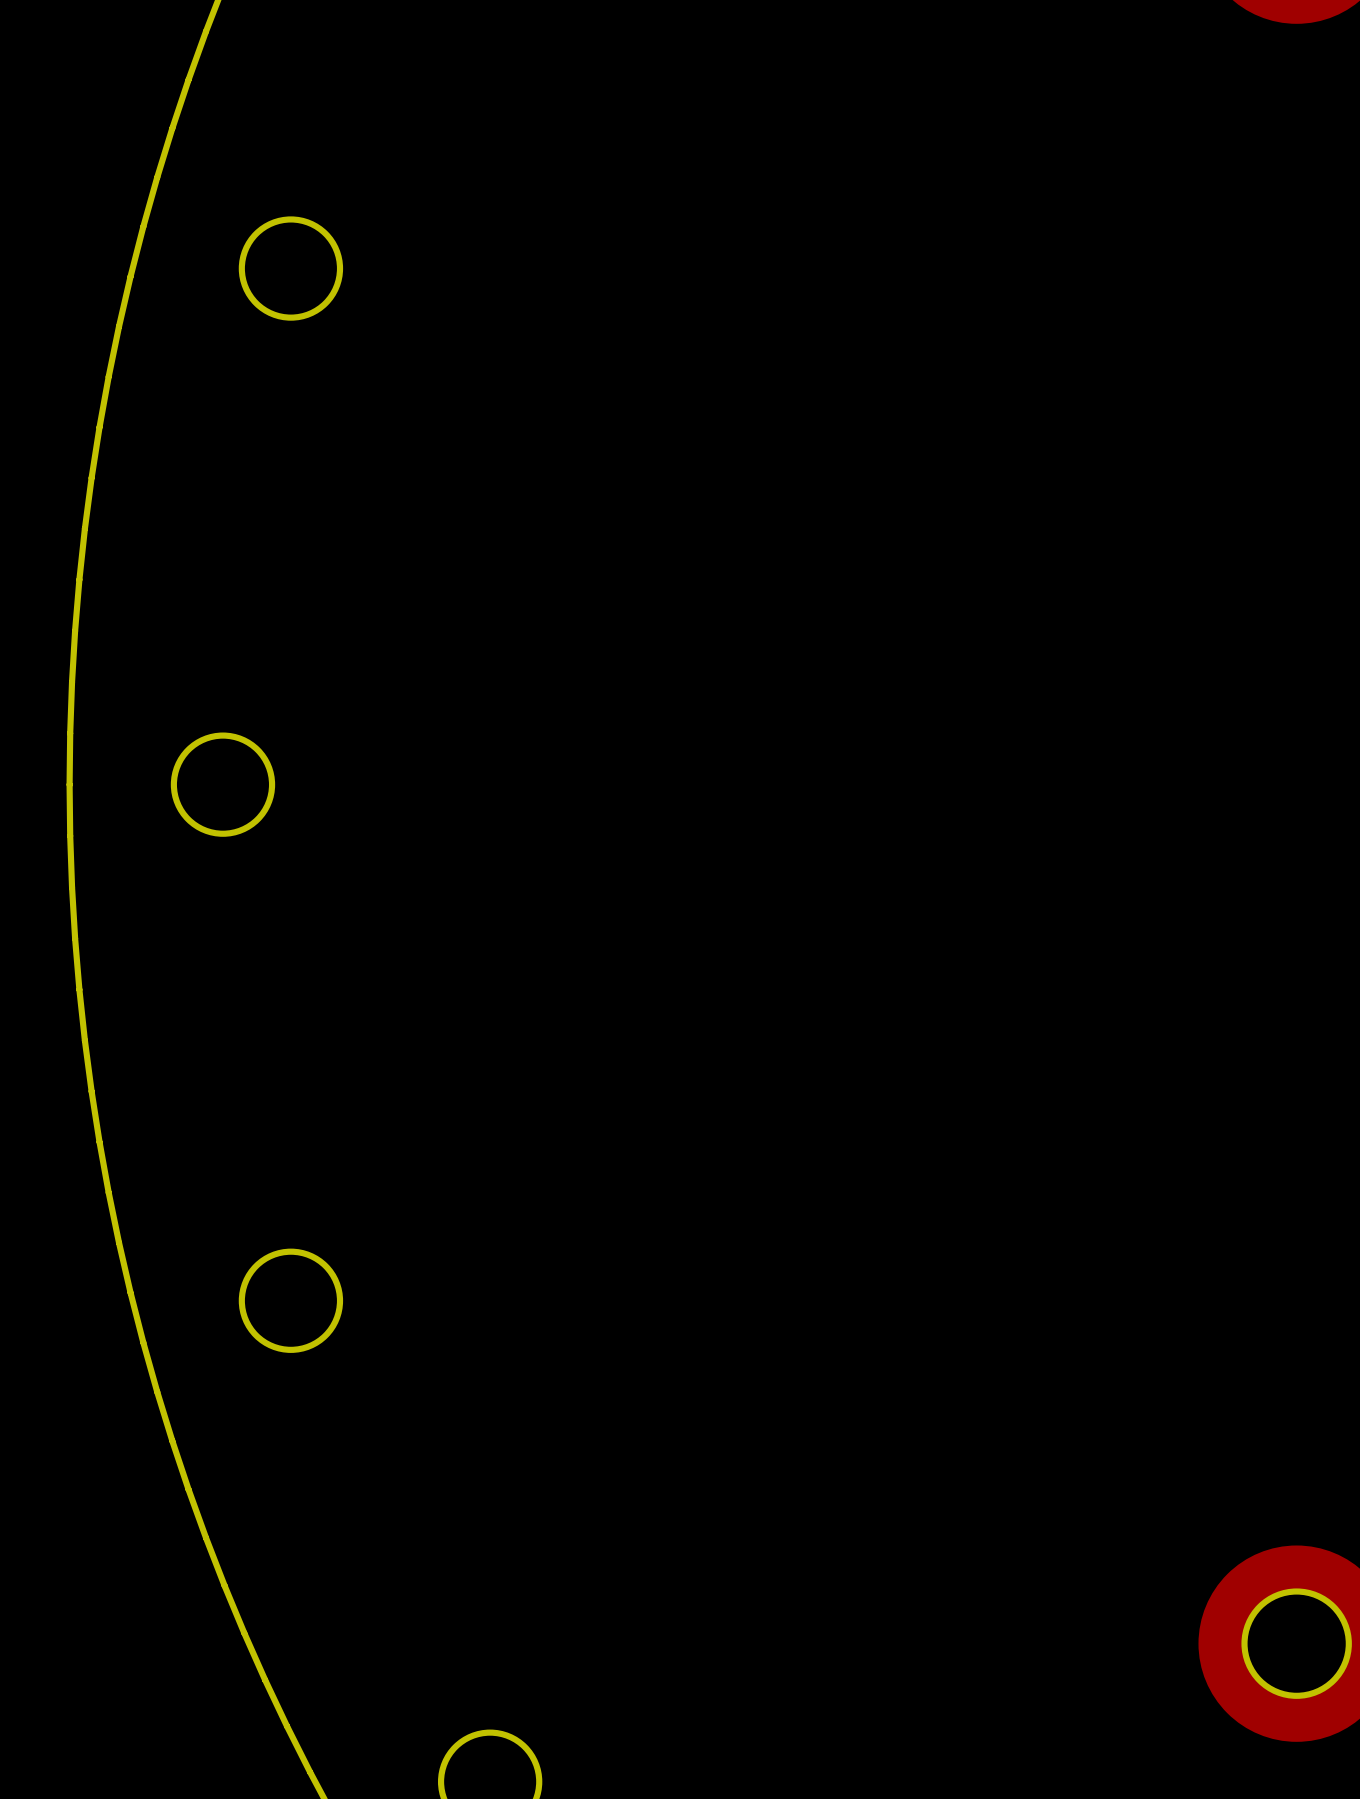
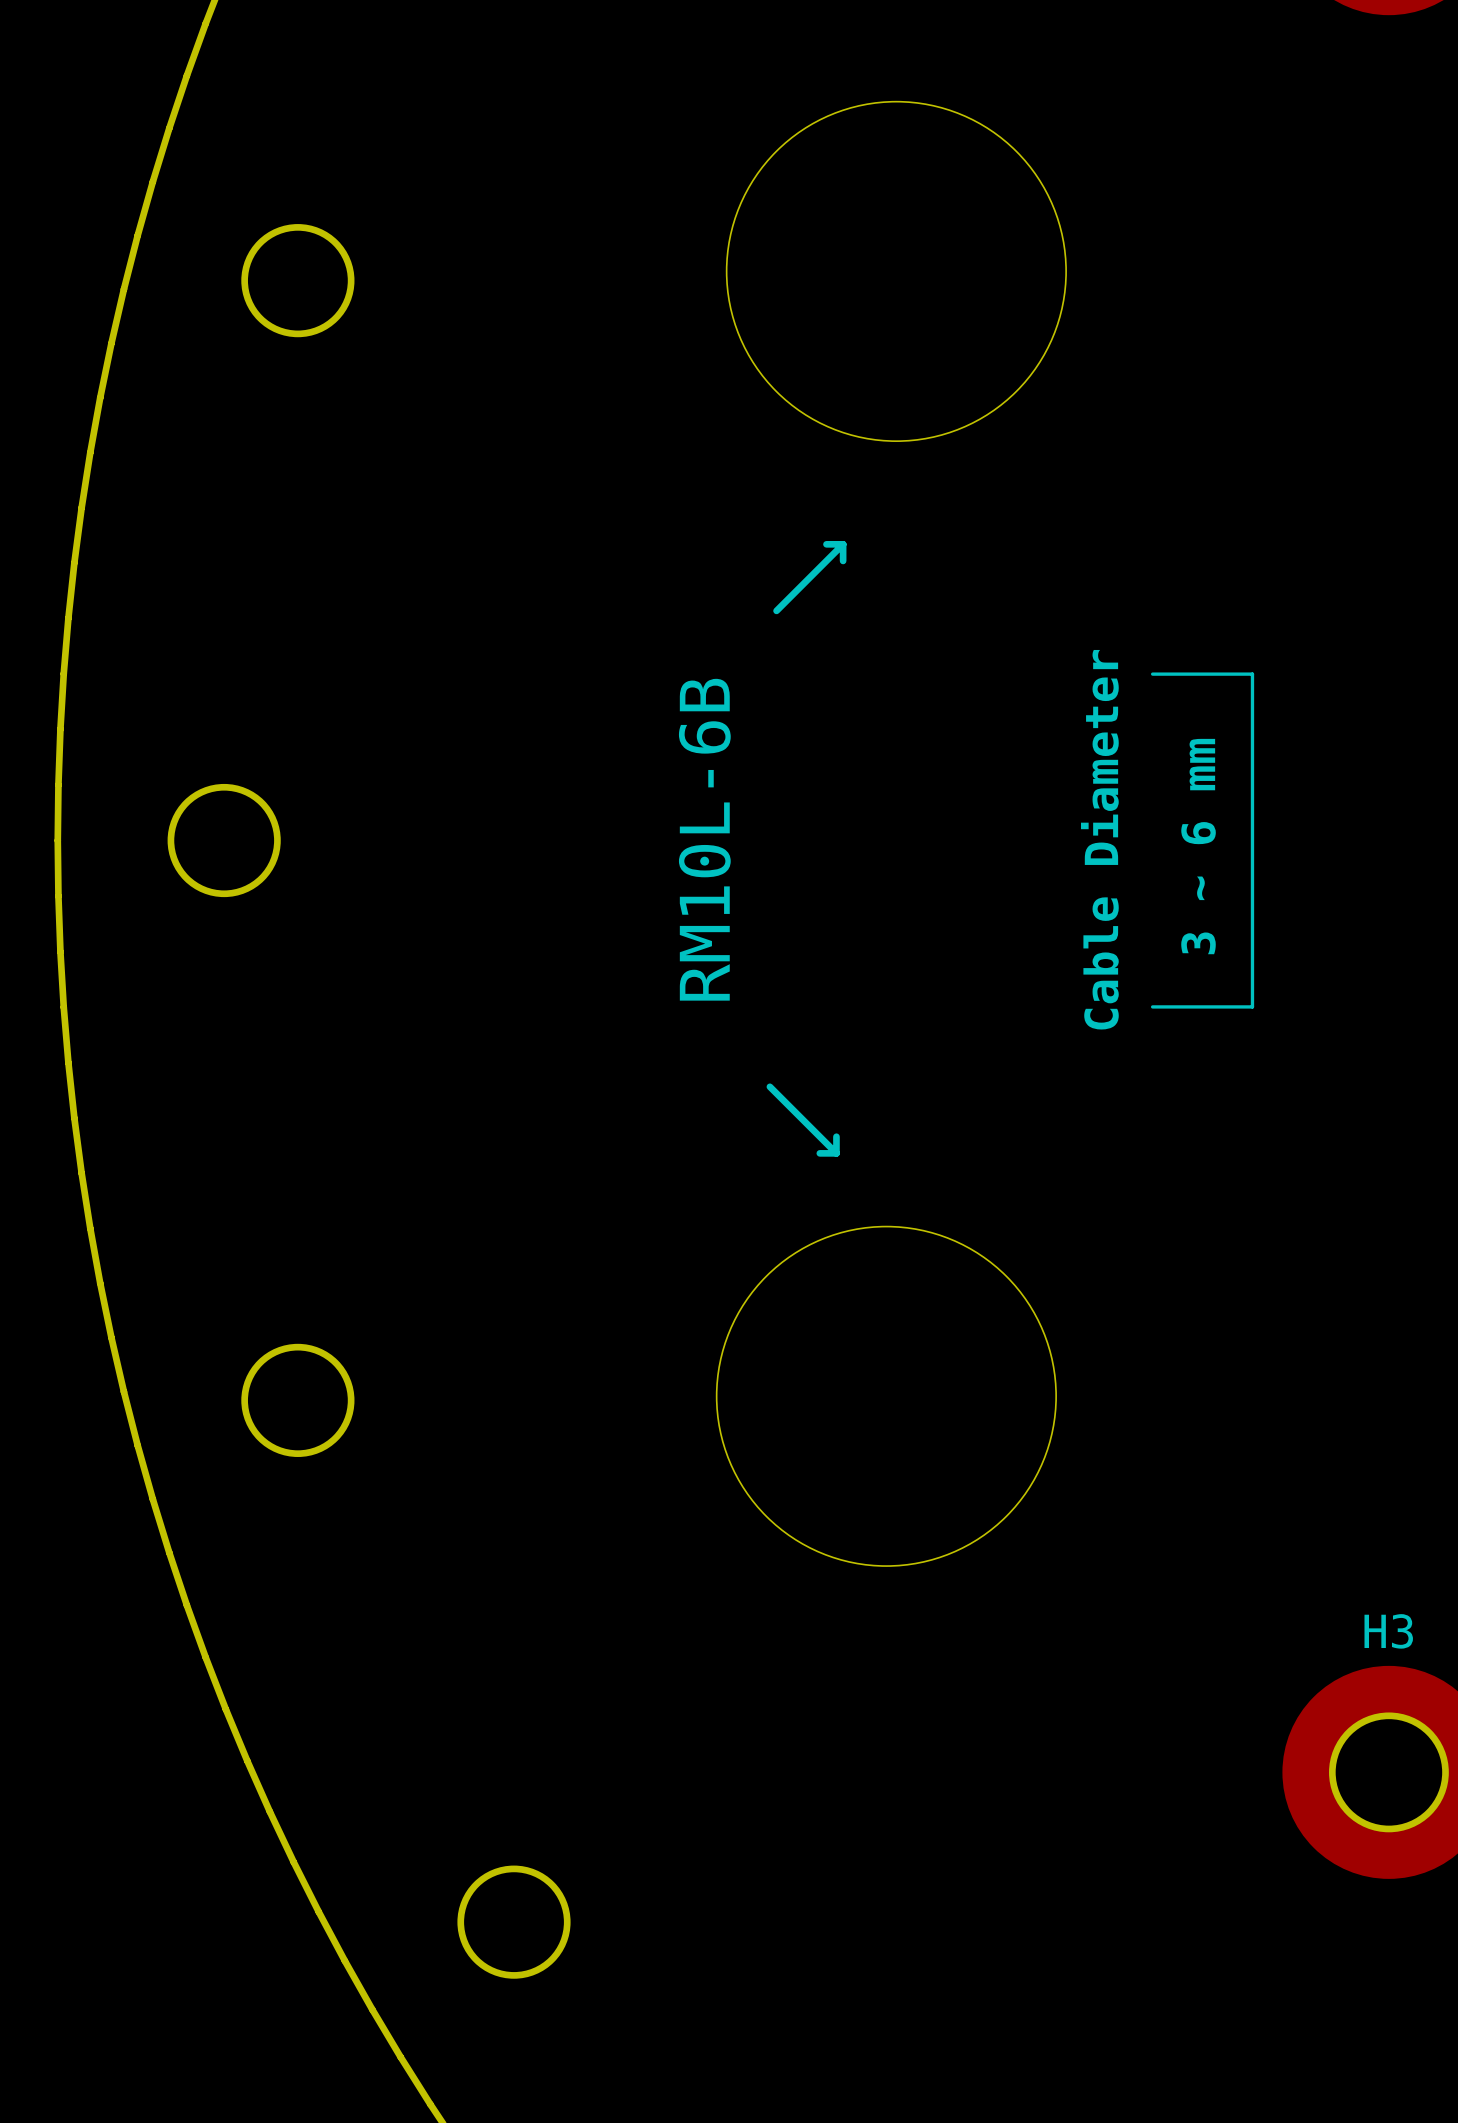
round board edge: none -> [725, 100, 1067, 442]
line: none -> (826, 544) (843, 544)
line: none -> (843, 544) (776, 610)
line: none -> (843, 544) (843, 560) (843, 544)
line: none -> (1152, 674) (1252, 674) (1252, 1006) (1152, 1006)
text: none -> RM10L-6B (704, 839)
text: none -> Cable Diameter (1099, 839)
text: none -> 3 ~ 6 mm (1198, 846)
line: none -> (769, 1086) (836, 1153)
line: none -> (836, 1136) (836, 1153)
line: none -> (836, 1153) (819, 1153) (836, 1153)
round board edge: none -> [715, 1225, 1057, 1567]
H3 name: none -> H3 (1388, 1631)

